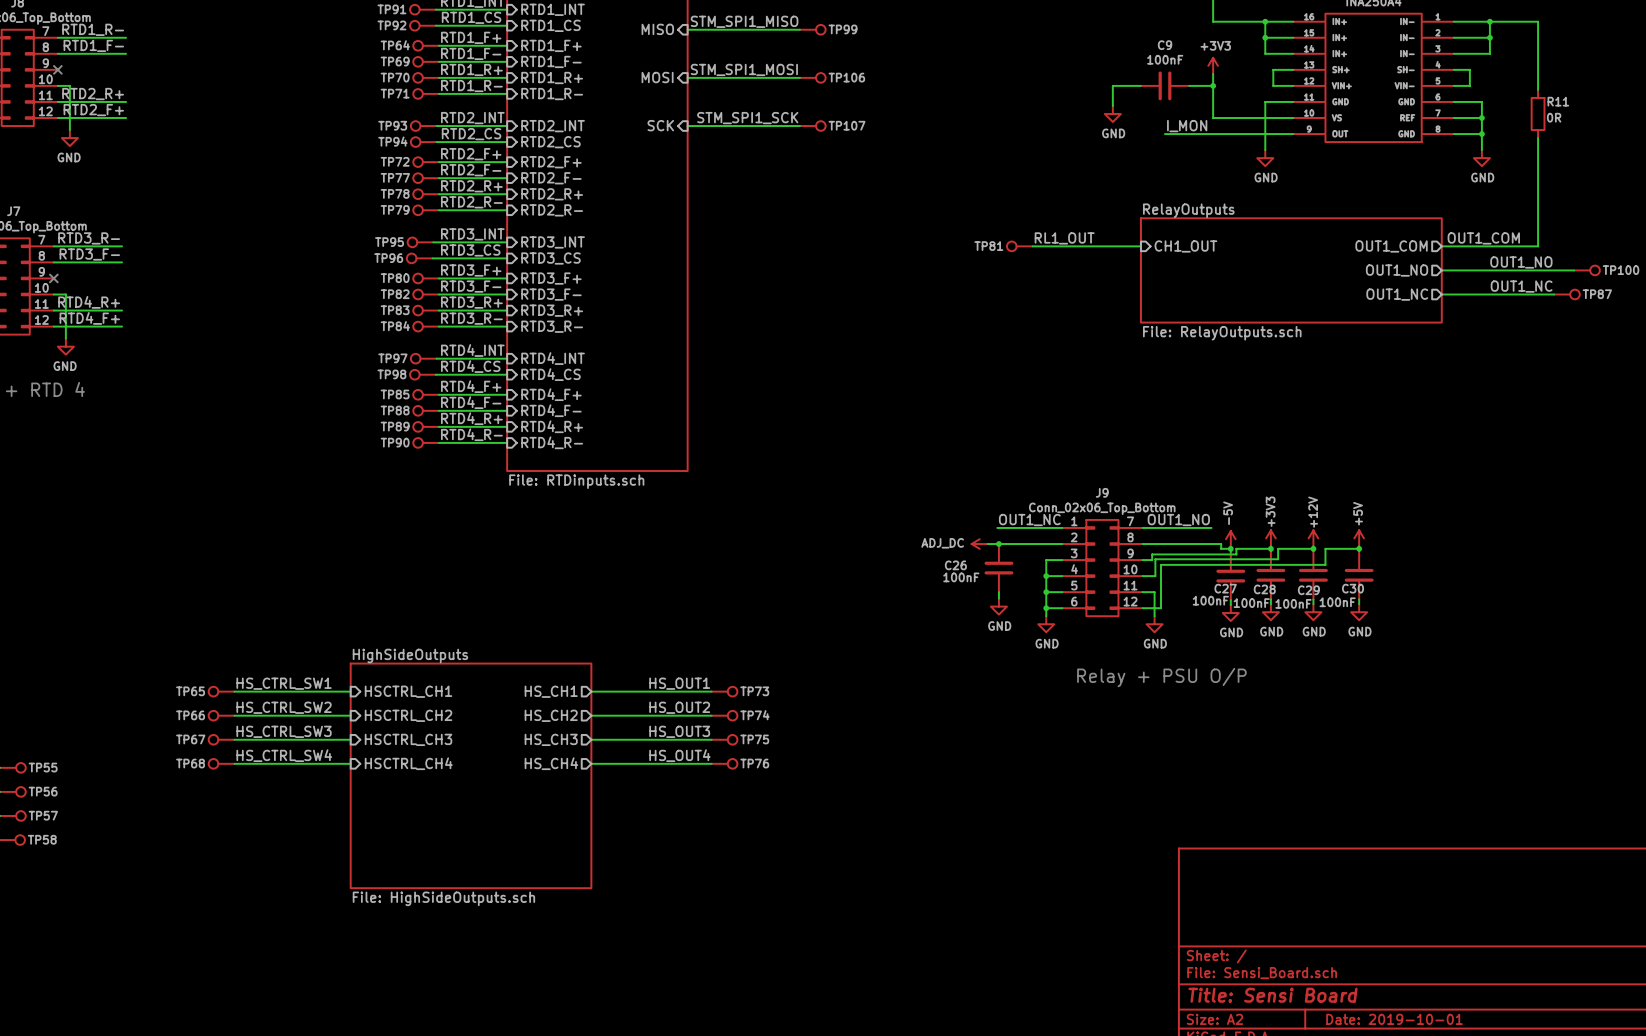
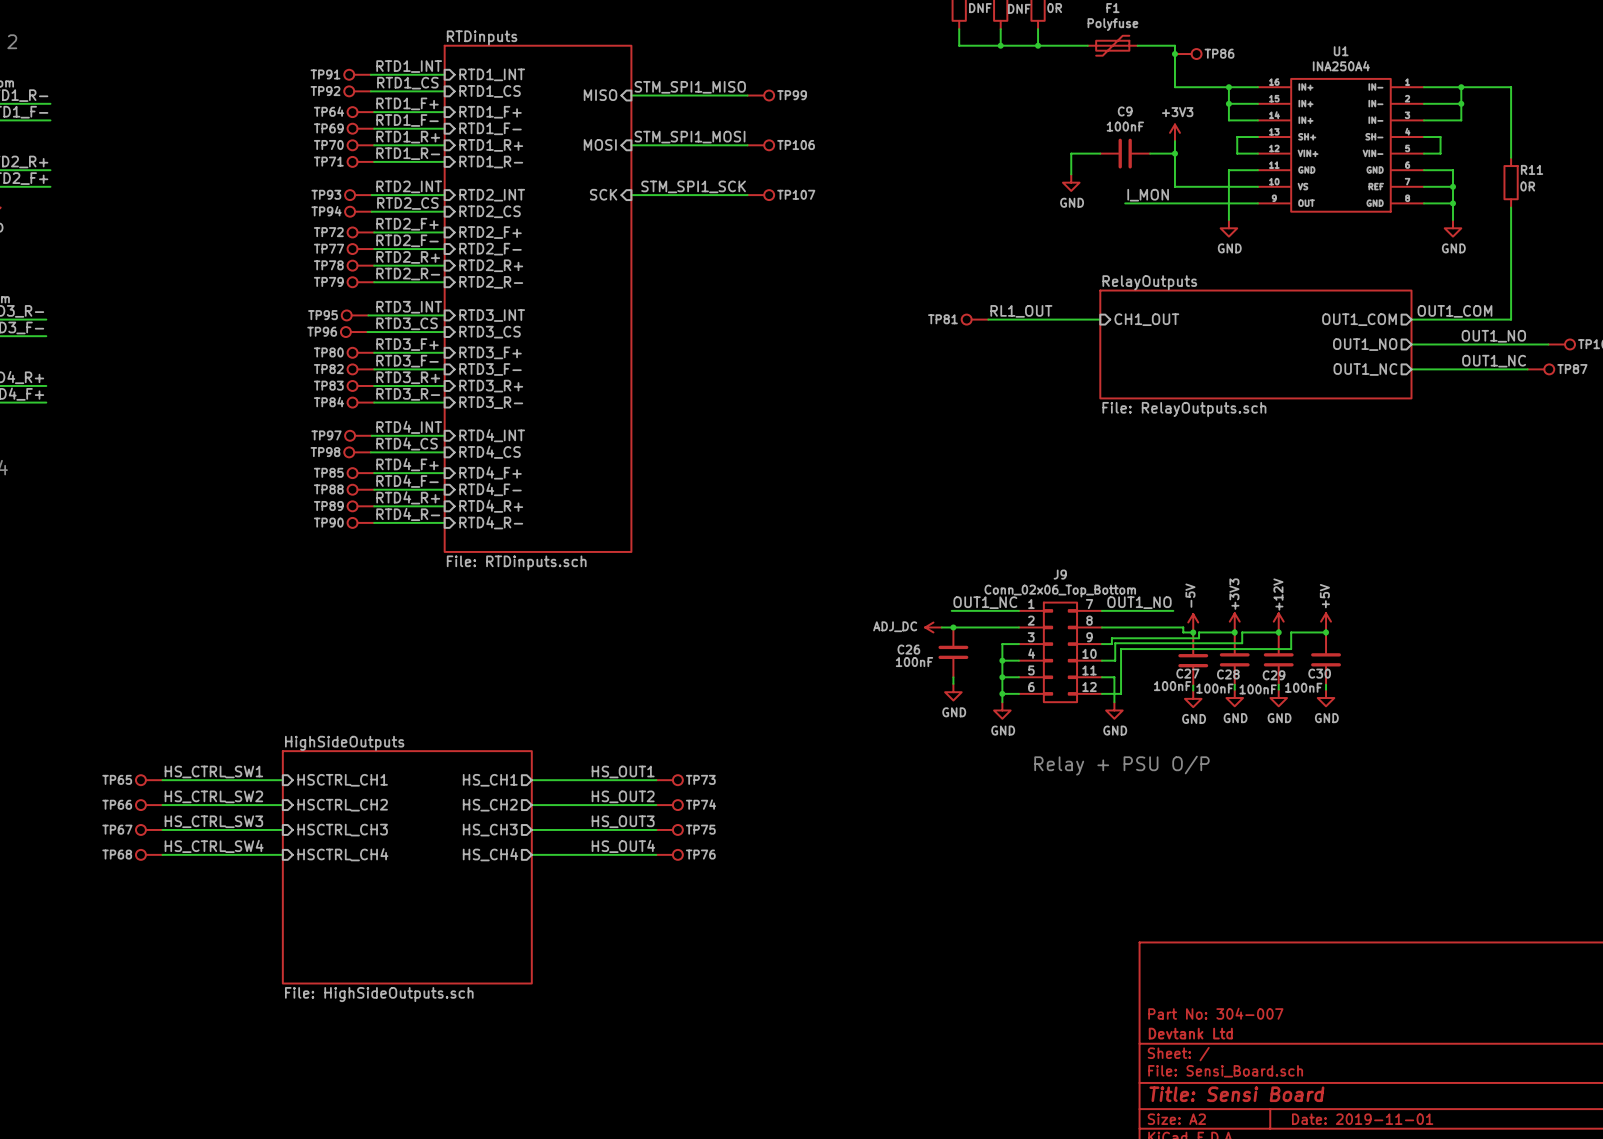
title block: none -> Part No: 304-007 (1215, 1013)
title block: none -> Devtank Ltd (1190, 1033)
title block: Date: 2019-10-01 (1394, 1019) -> Date: 2019-11-01 (1362, 1119)

